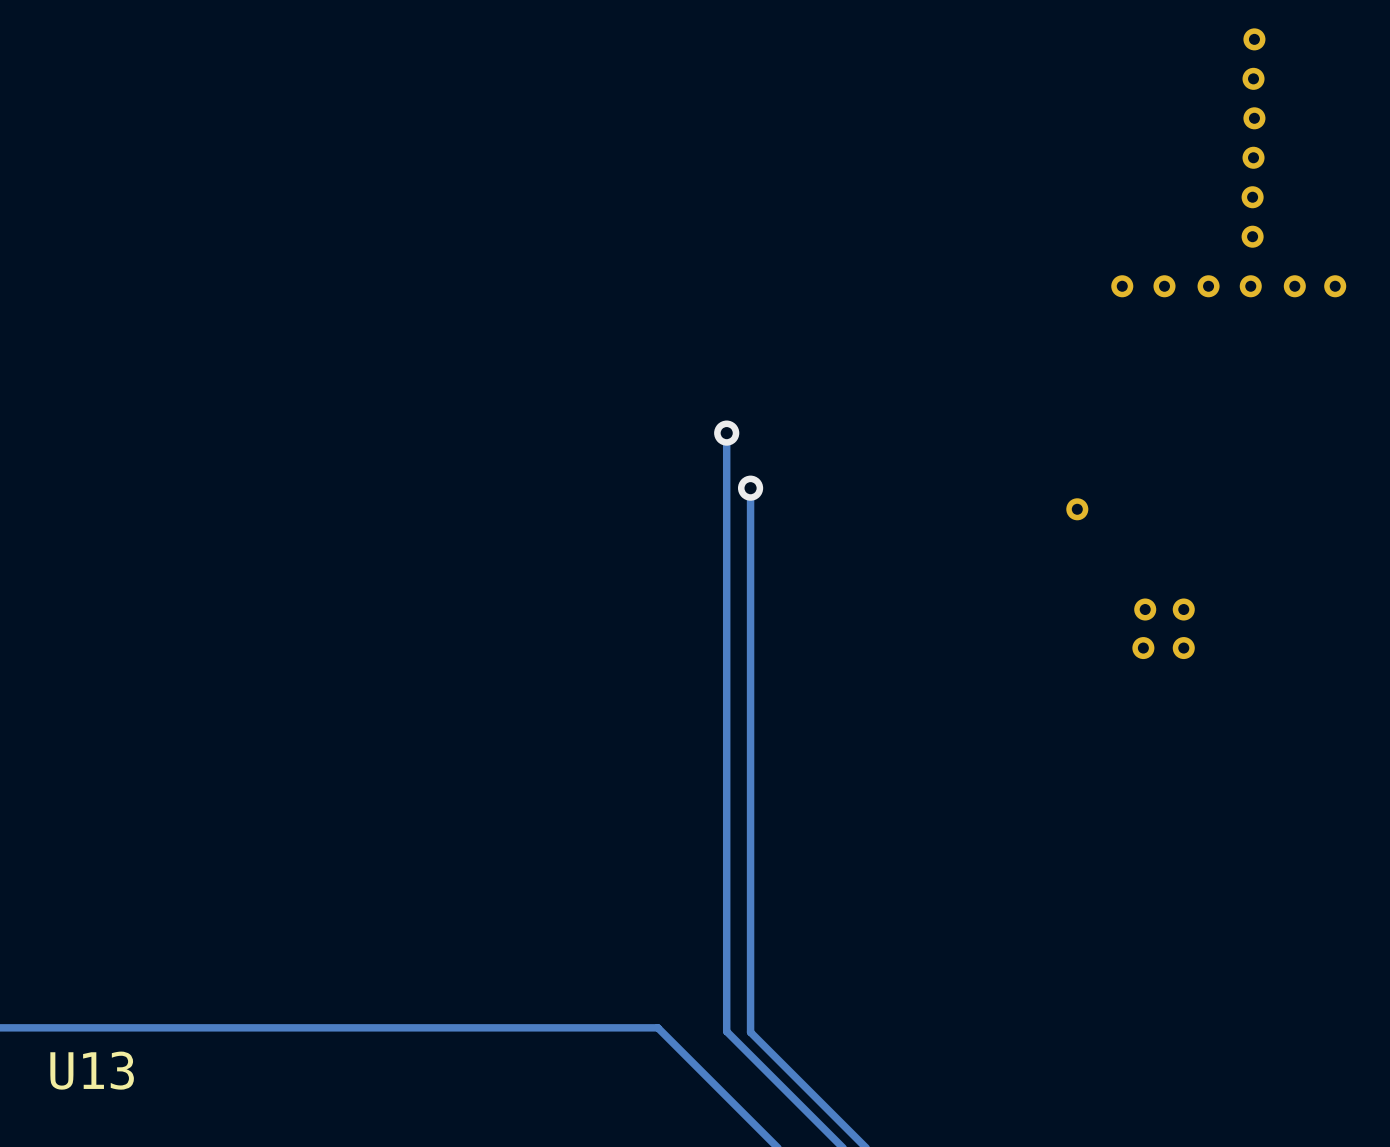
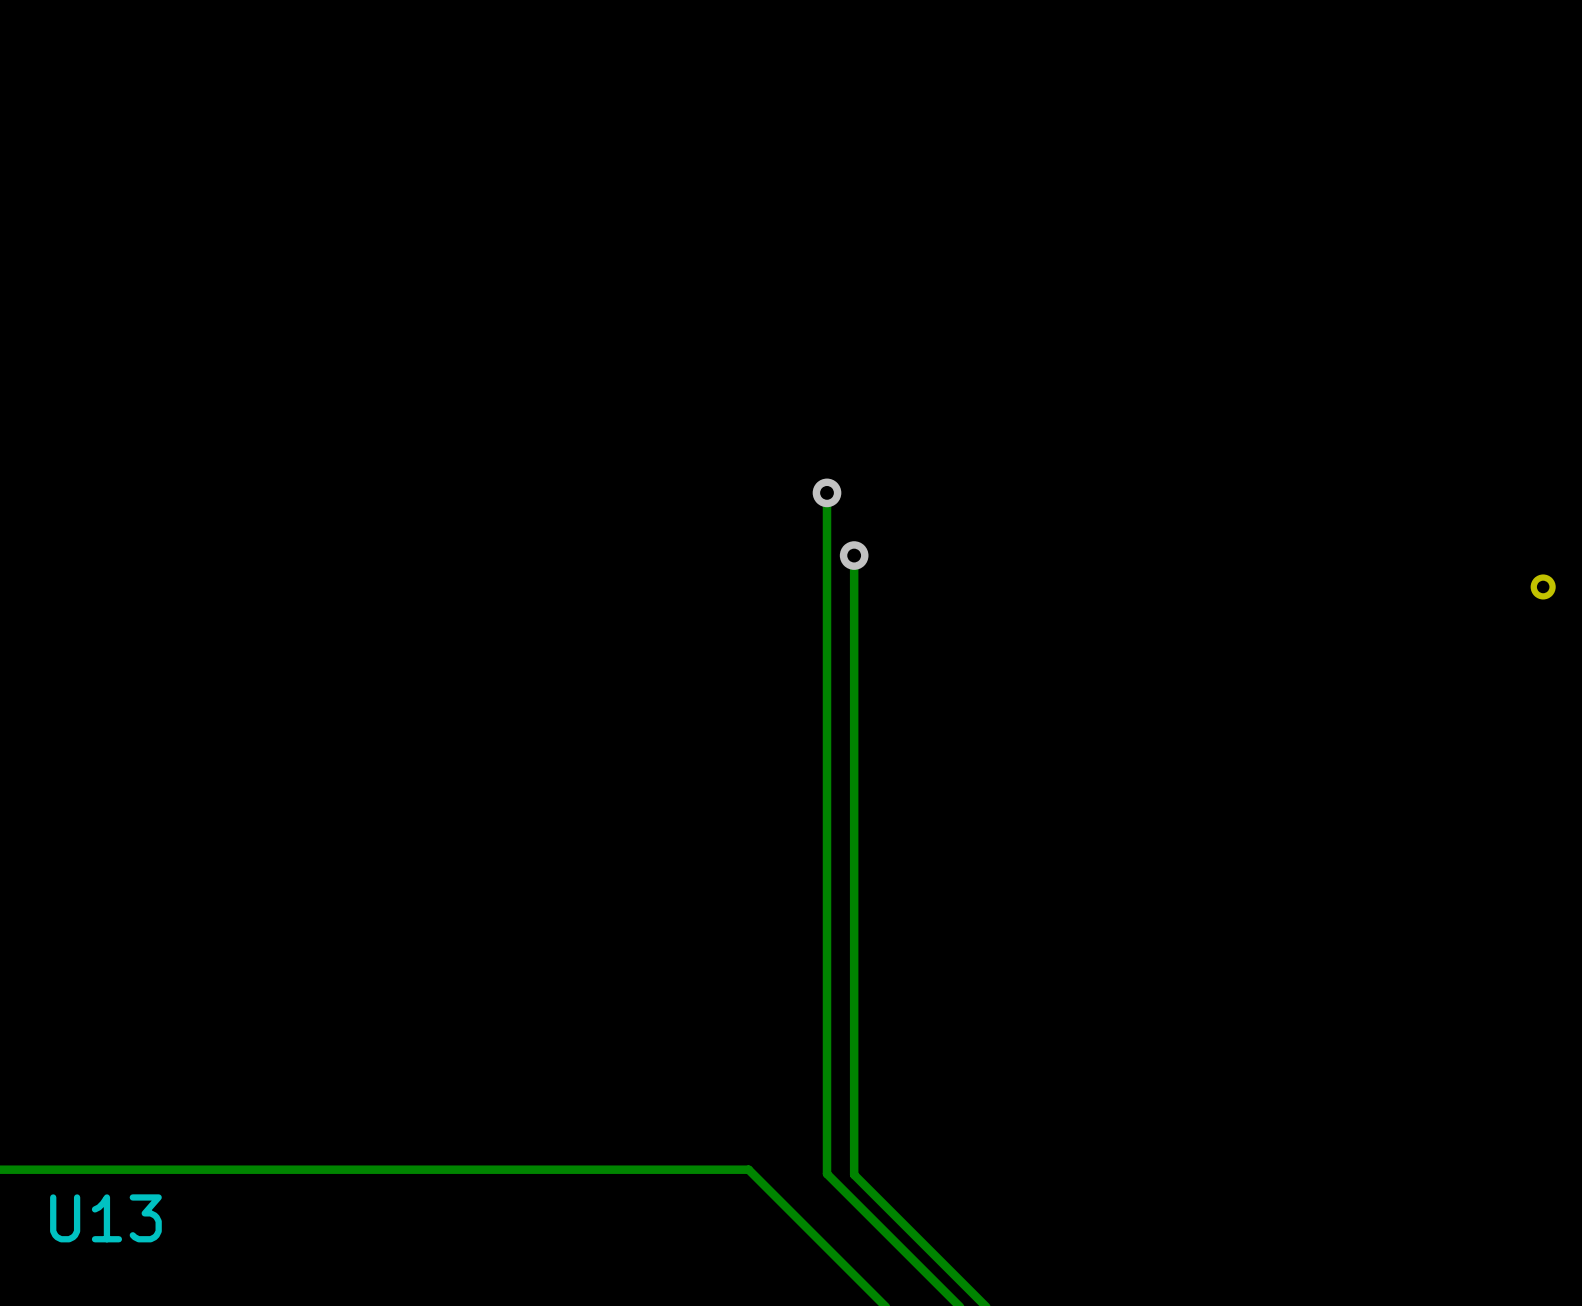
part: (1254, 39) -> none
part: (1253, 78) -> none
part: (1254, 118) -> none
part: (1253, 157) -> none
part: (1252, 197) -> none
part: (1252, 236) -> none
part: (1122, 286) -> none
part: (1164, 286) -> none
part: (1208, 286) -> none
part: (1250, 286) -> none
part: (1294, 286) -> none
part: (1335, 286) -> none
part: (1077, 509) -> none
part: none -> (1543, 586)
part: (1145, 609) -> none
part: (1183, 609) -> none
part: (1143, 648) -> none
part: (1183, 648) -> none

